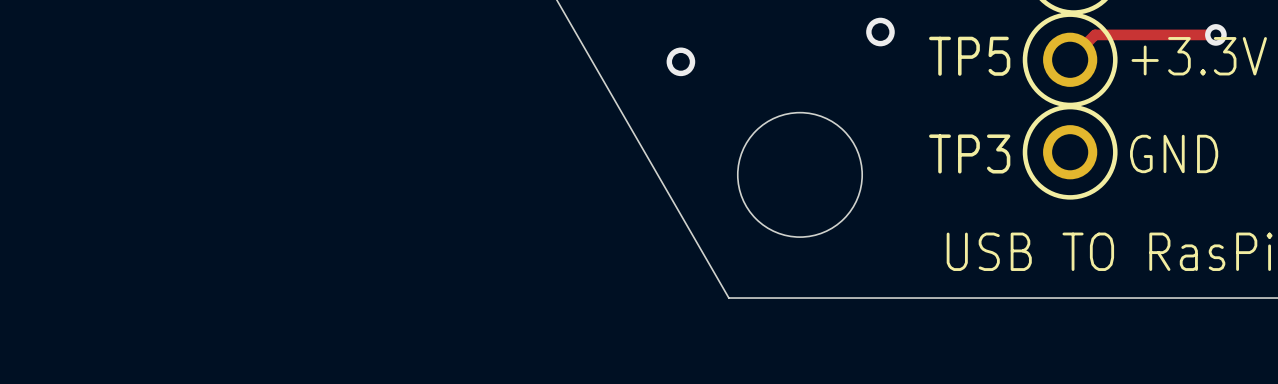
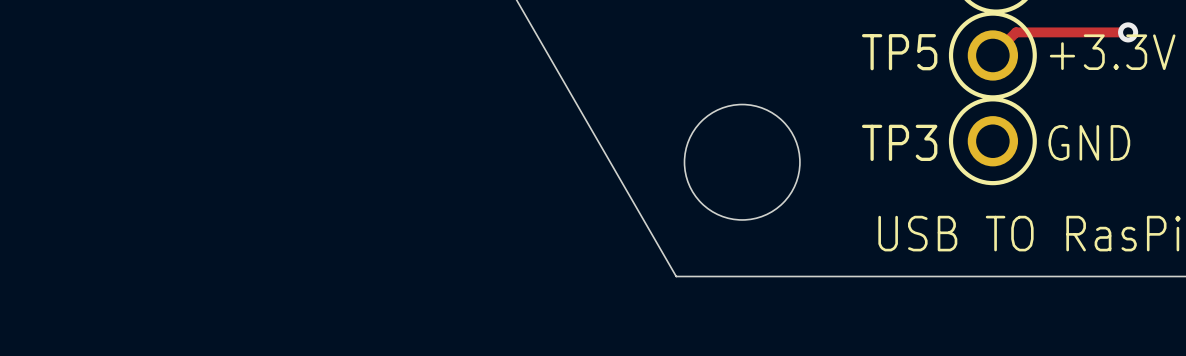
via: (880, 32) -> none
via: (680, 61) -> none

